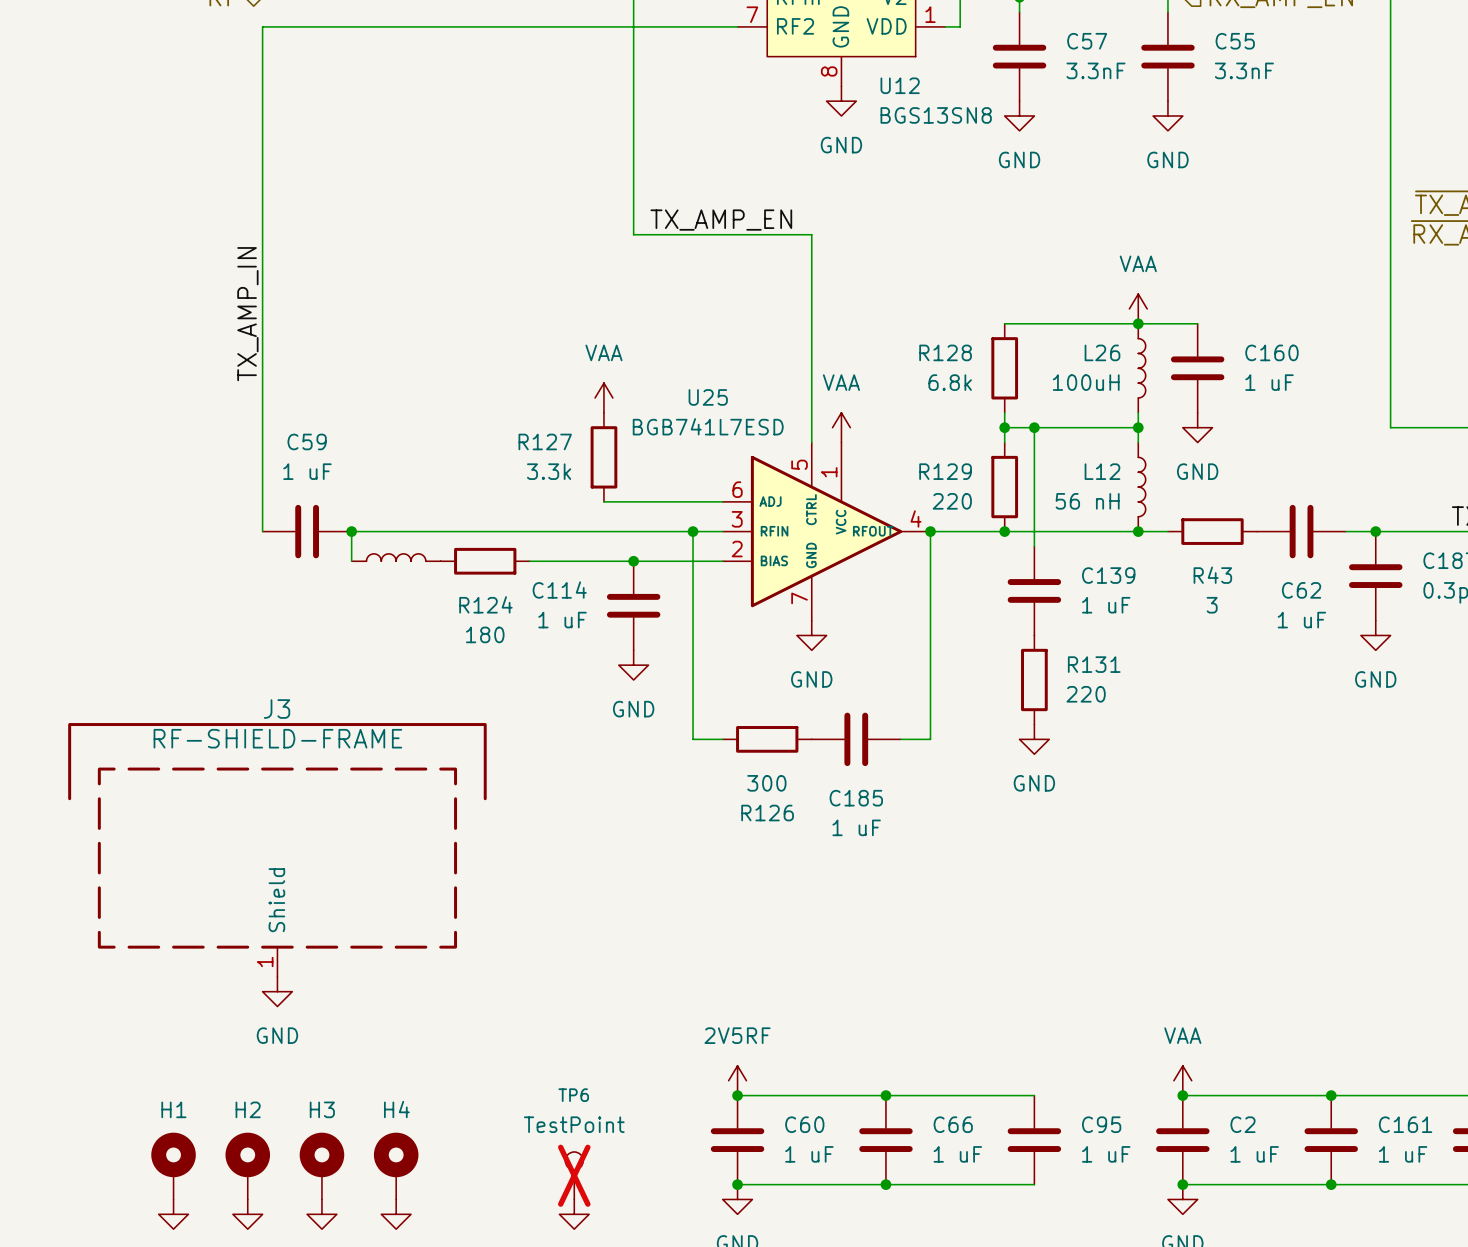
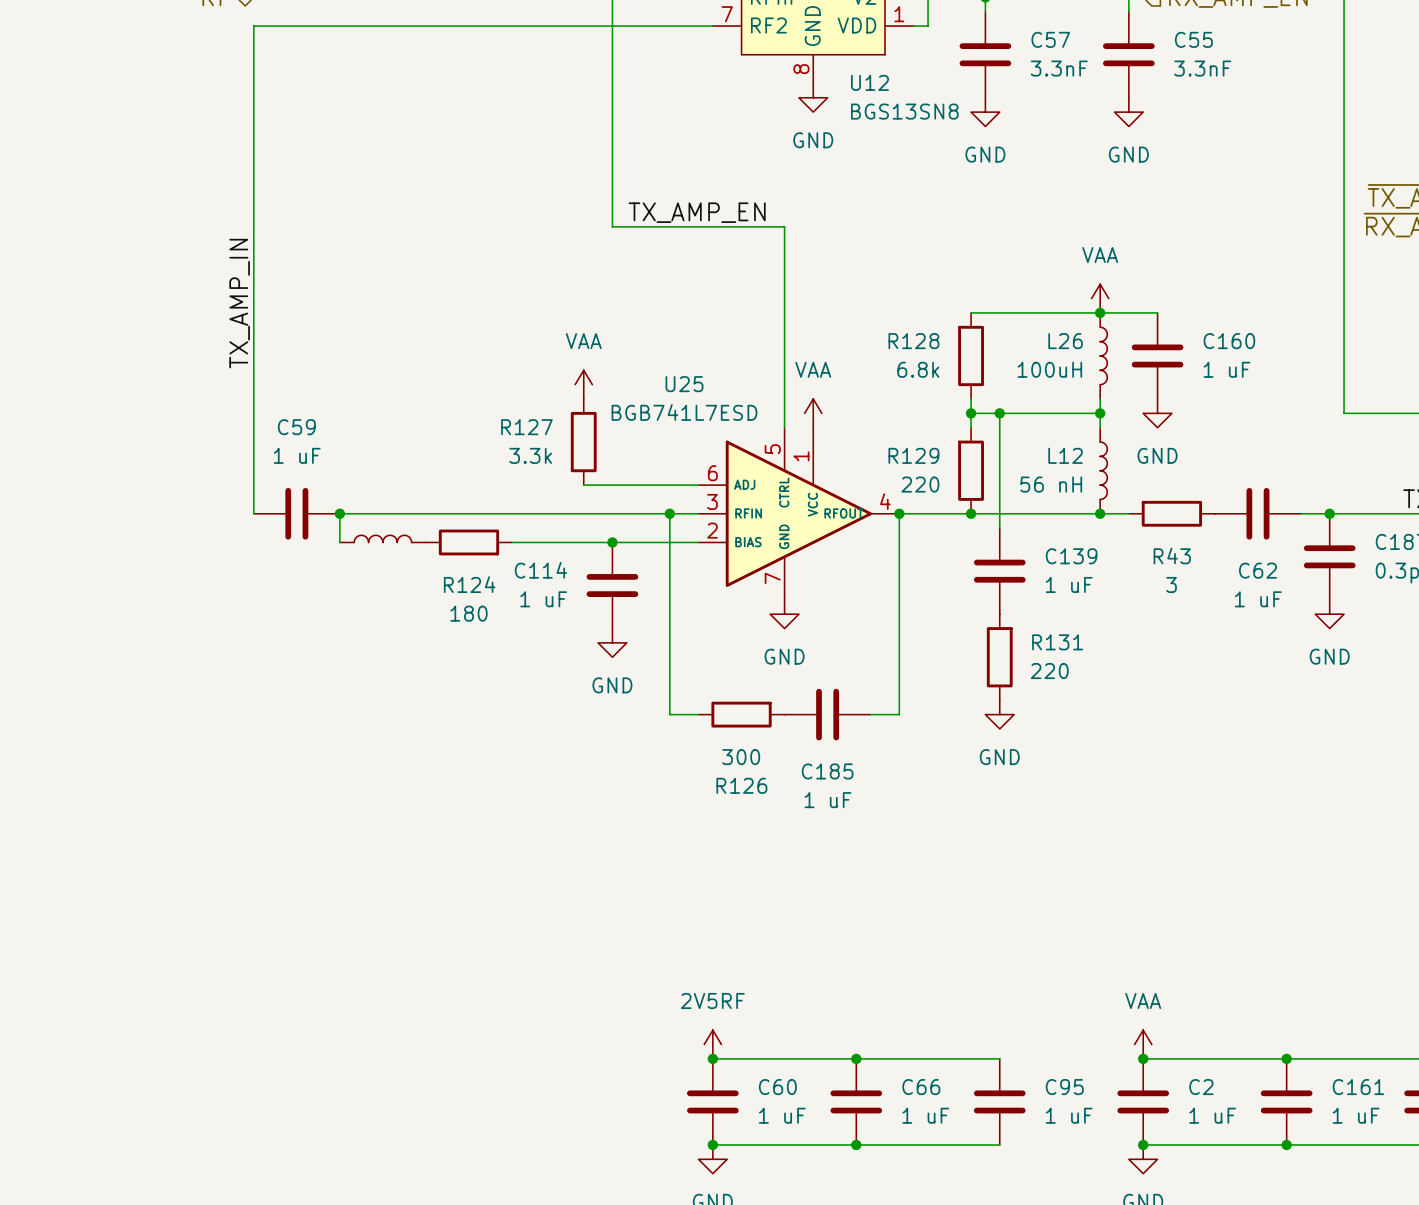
J3: RF-SHIELD-FRAME (277, 849) -> none
power symbol: GND (277, 991) -> none
H1: (173, 1166) -> none
H2: (247, 1166) -> none
H3: (321, 1166) -> none
H4: (396, 1166) -> none
TP6: TestPoint (574, 1175) -> none
power symbol: (173, 1214) -> none
power symbol: (247, 1214) -> none
power symbol: (321, 1214) -> none
power symbol: (396, 1214) -> none
power symbol: (574, 1214) -> none

